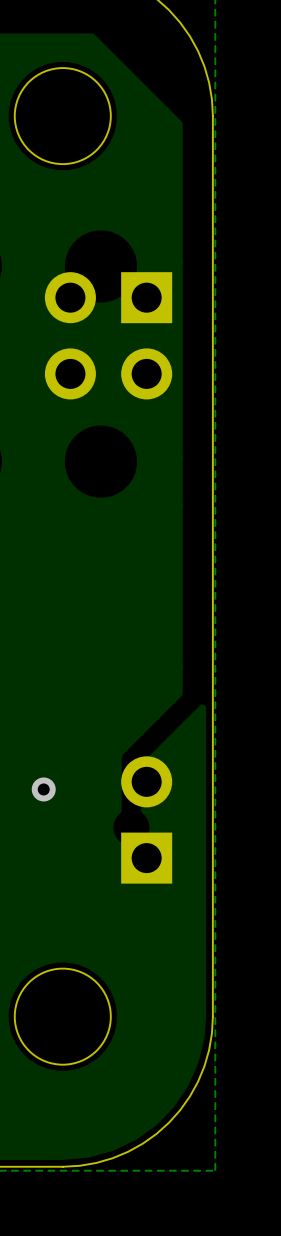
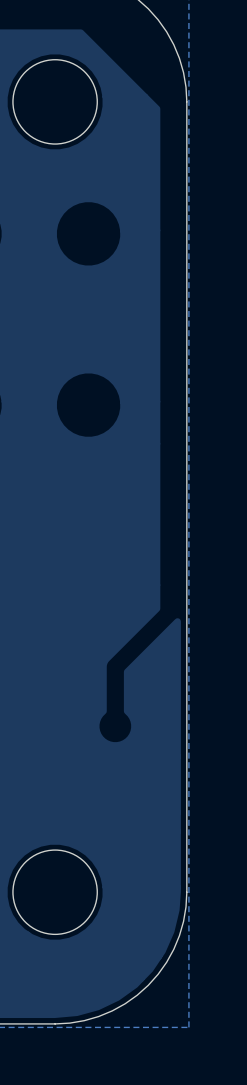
part: (108, 335) -> none
via: (43, 789) -> none
part: (146, 819) -> none

